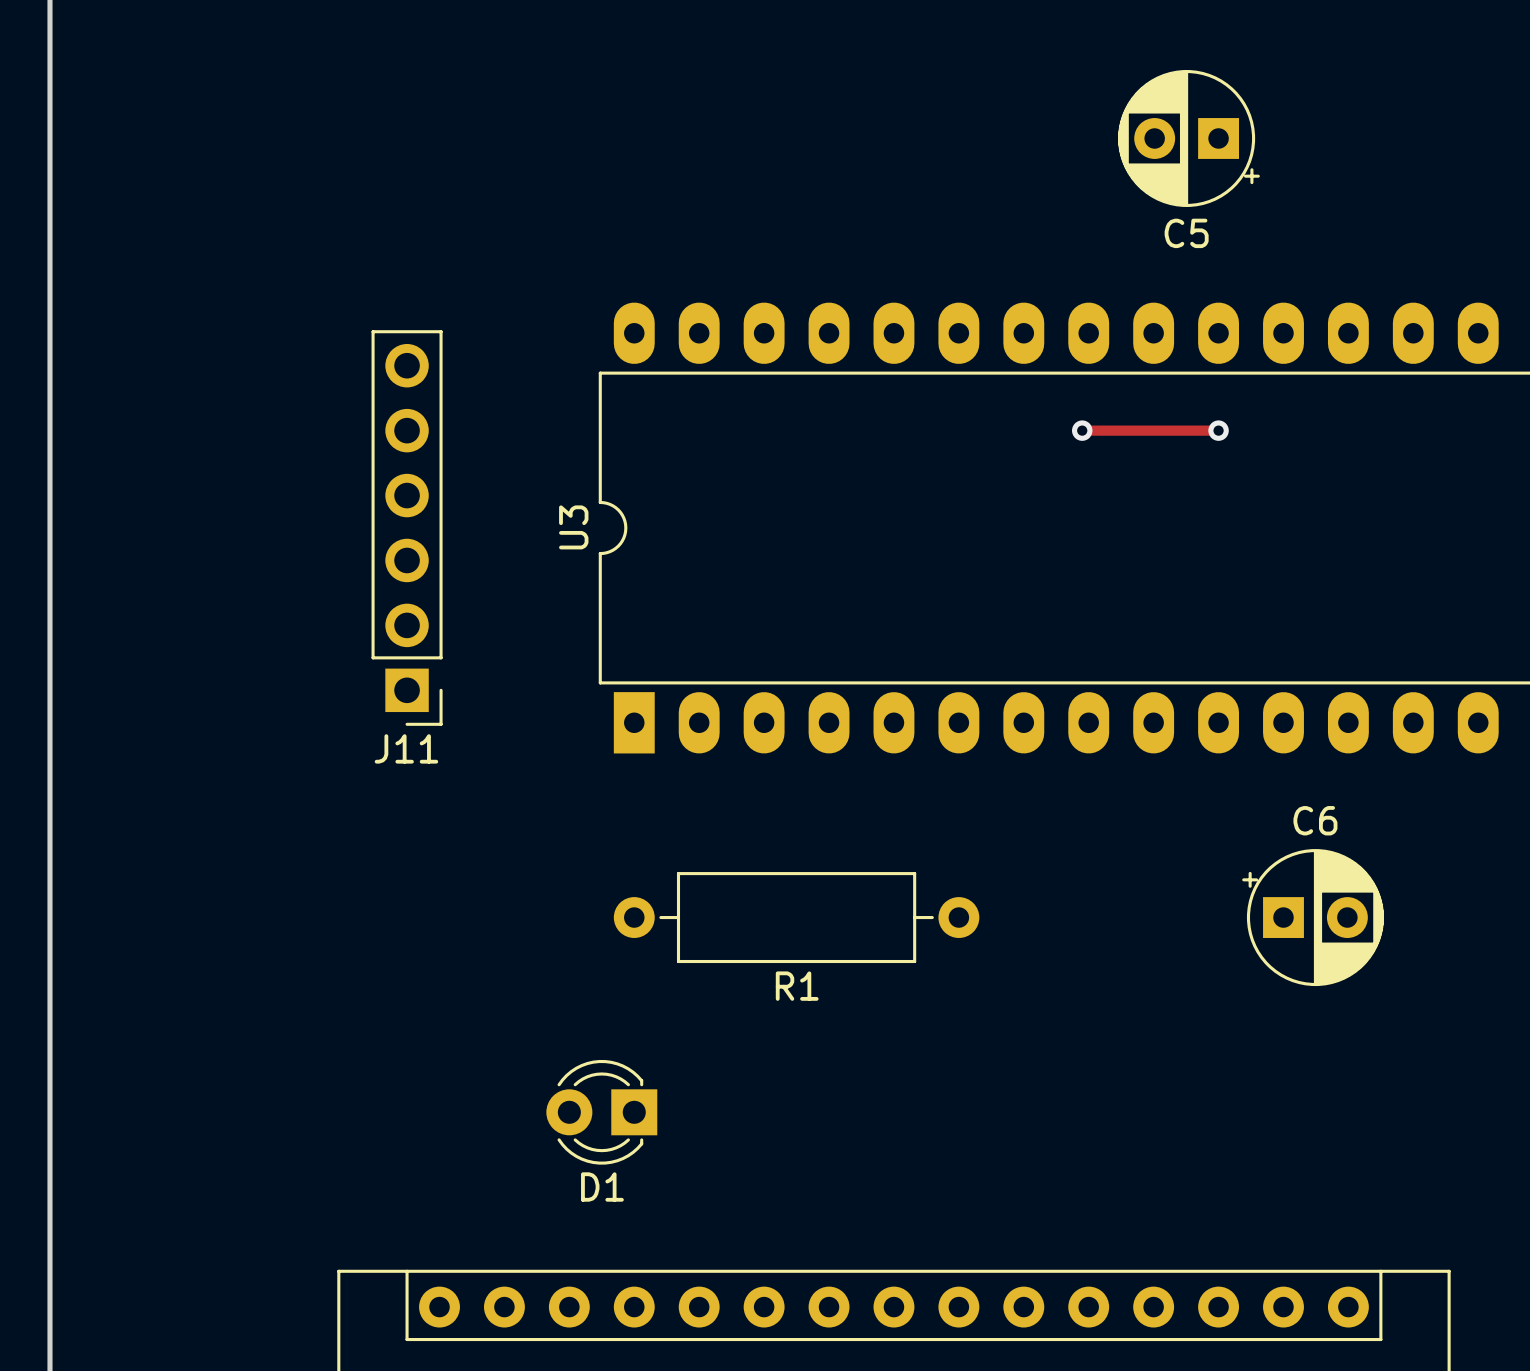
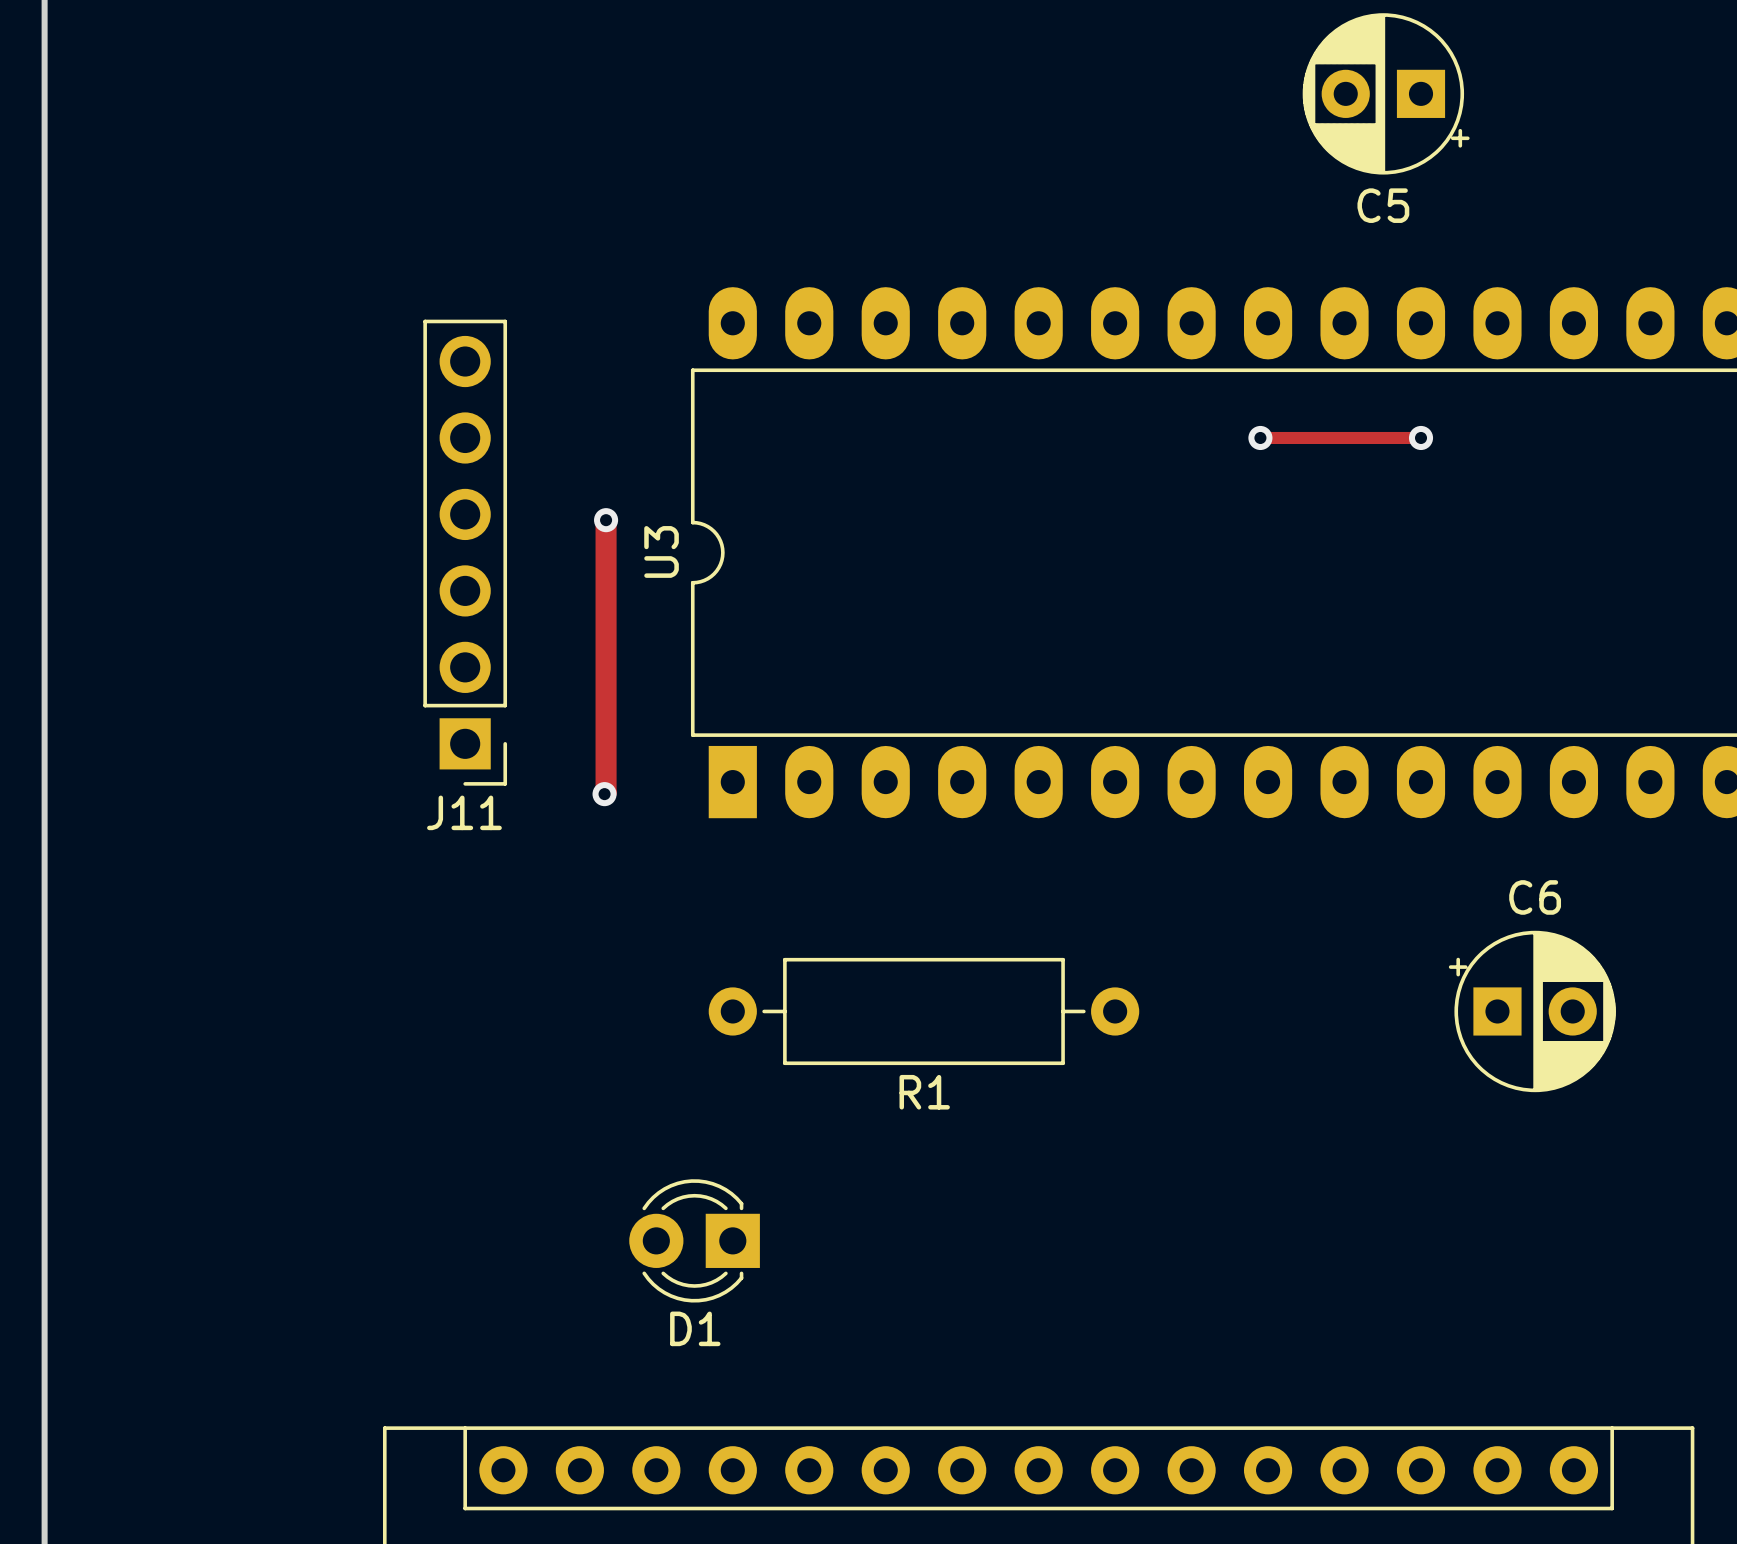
track: none -> (606, 520) (604, 794)
via: none -> (606, 520)
via: none -> (604, 794)

